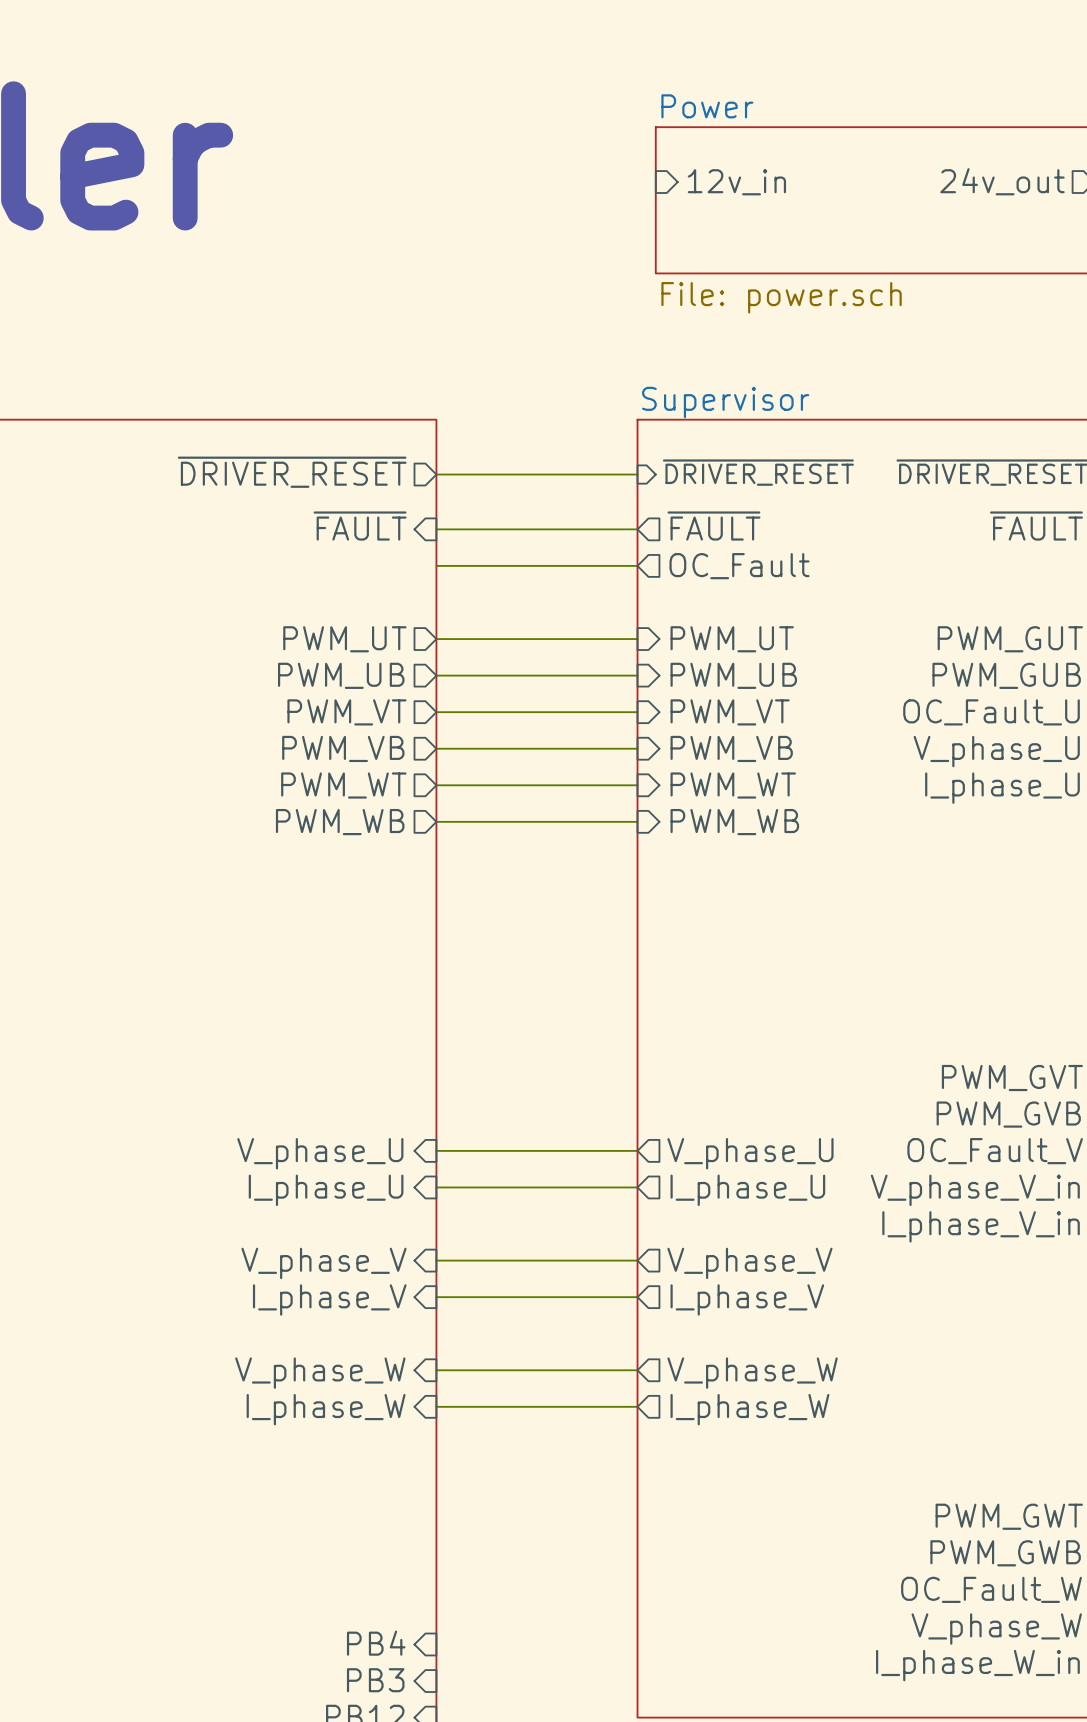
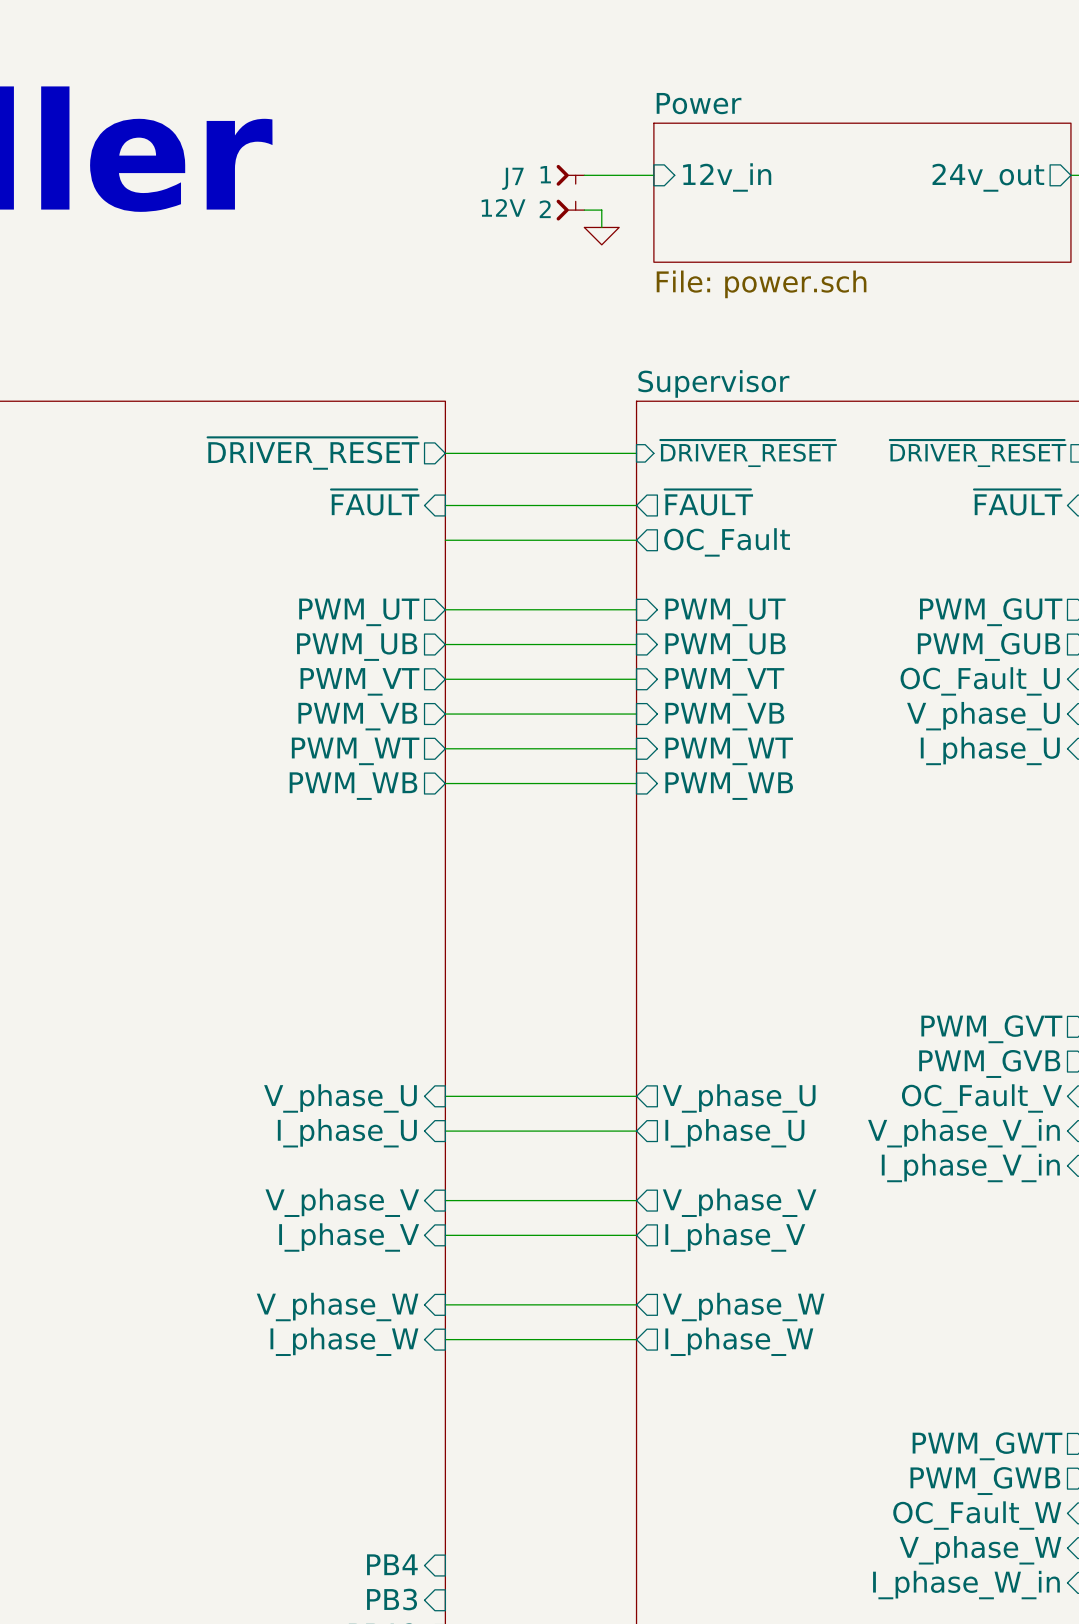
wire: none -> (584, 175) (653, 175)
J7: none -> 12V (570, 192)
wire: none -> (584, 210) (601, 210) (601, 227)
power symbol: none -> (601, 236)

